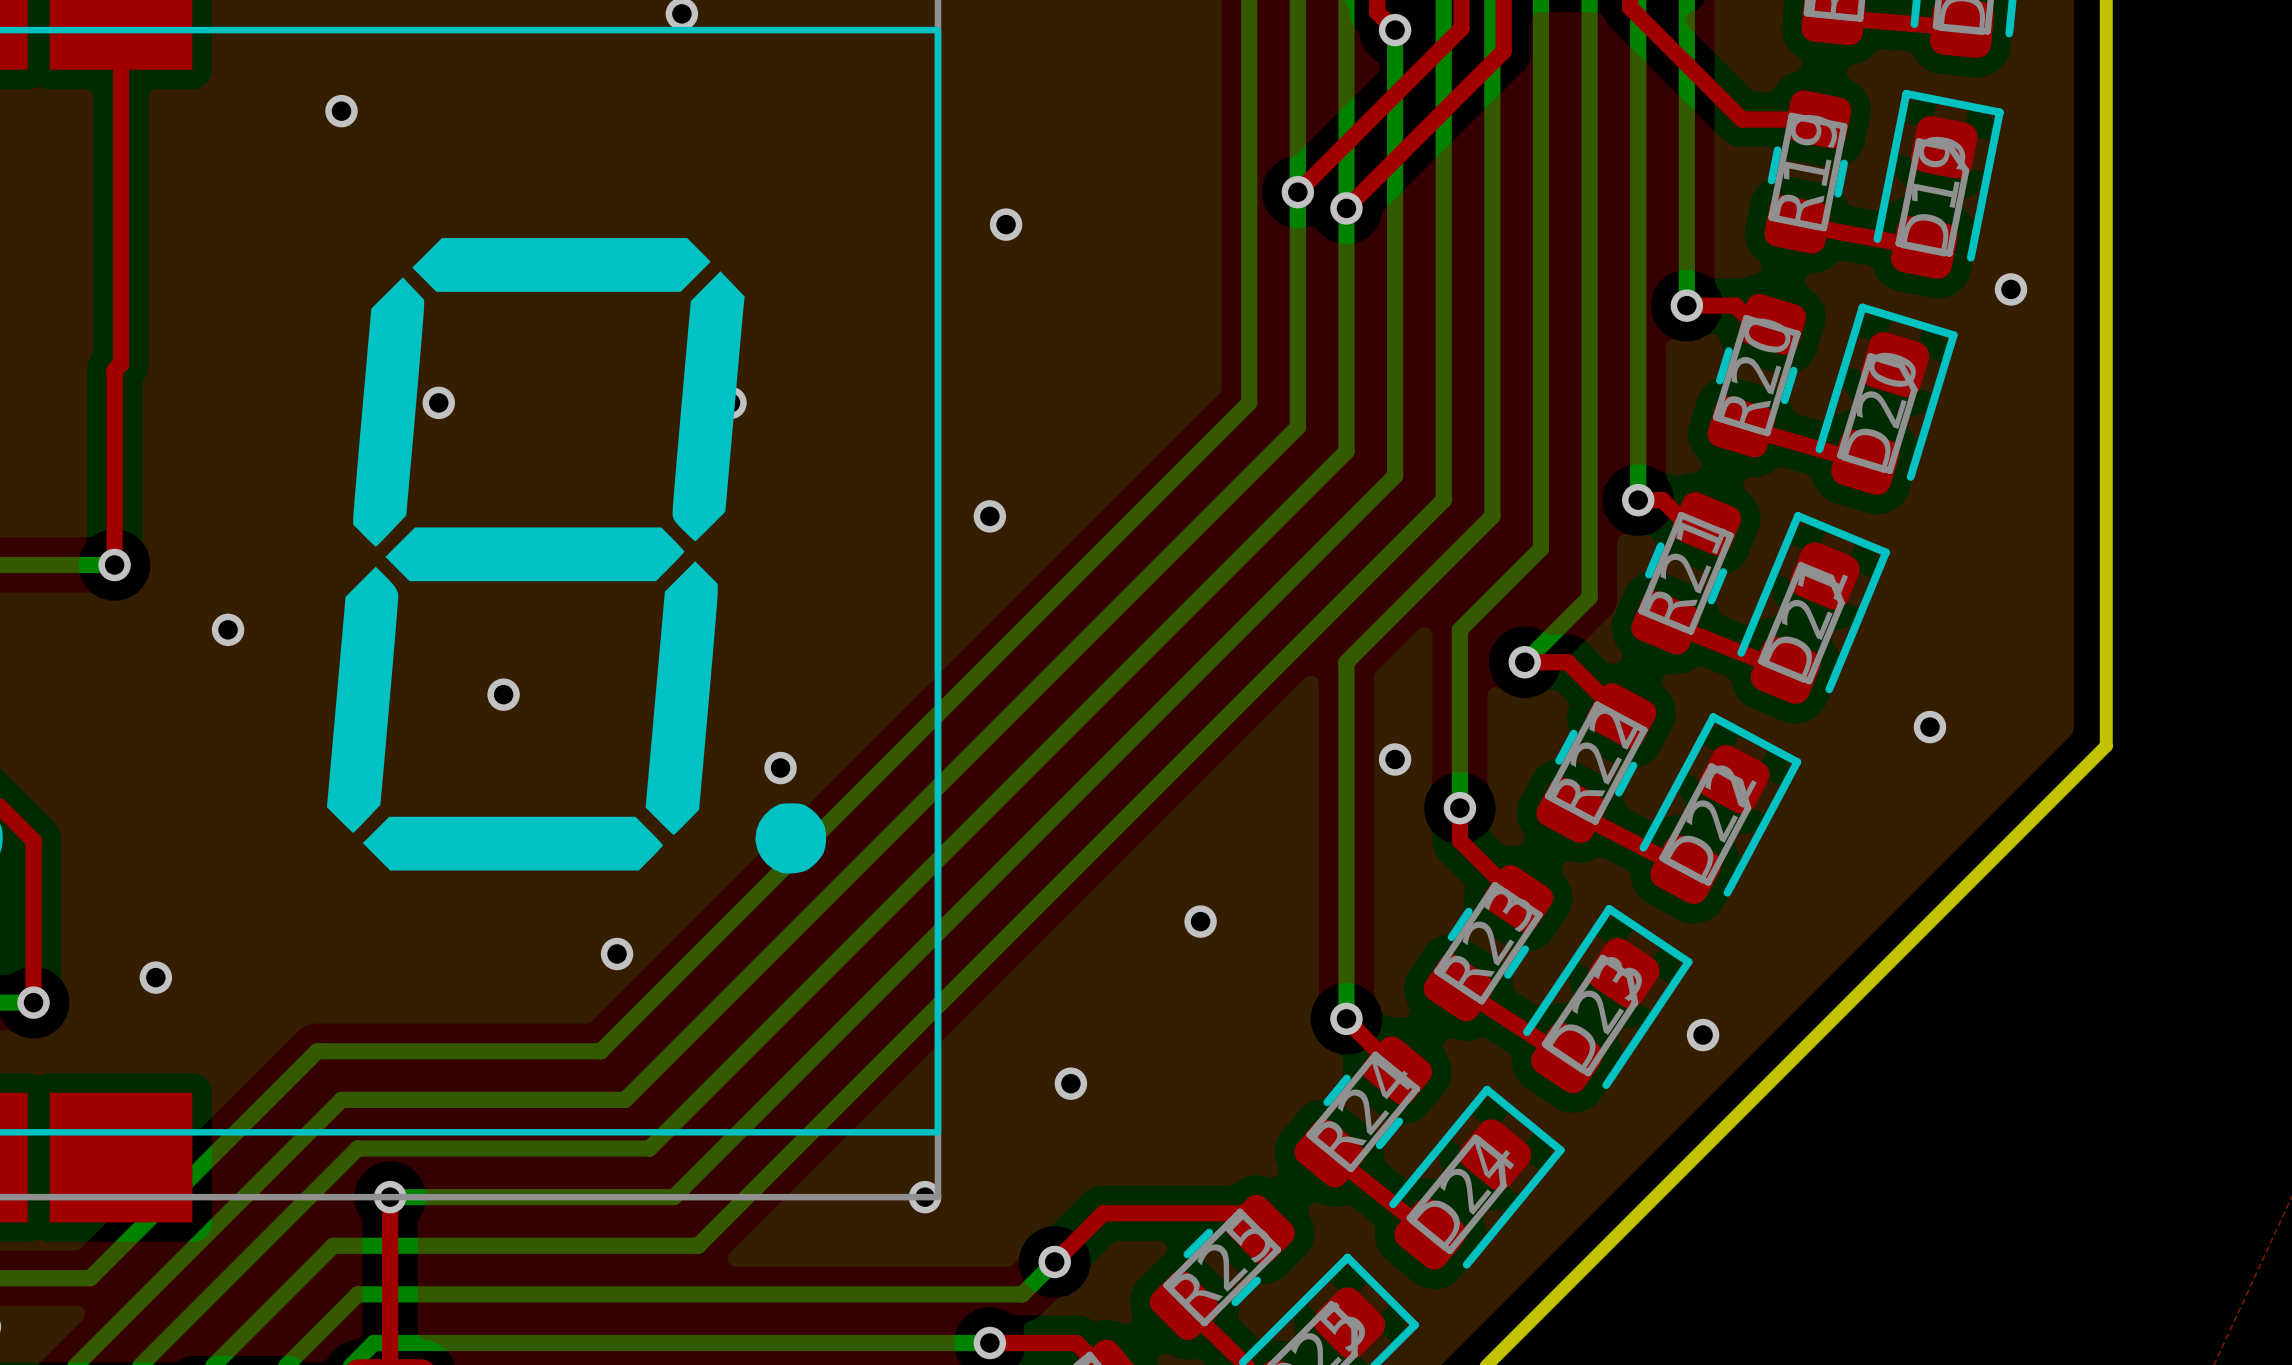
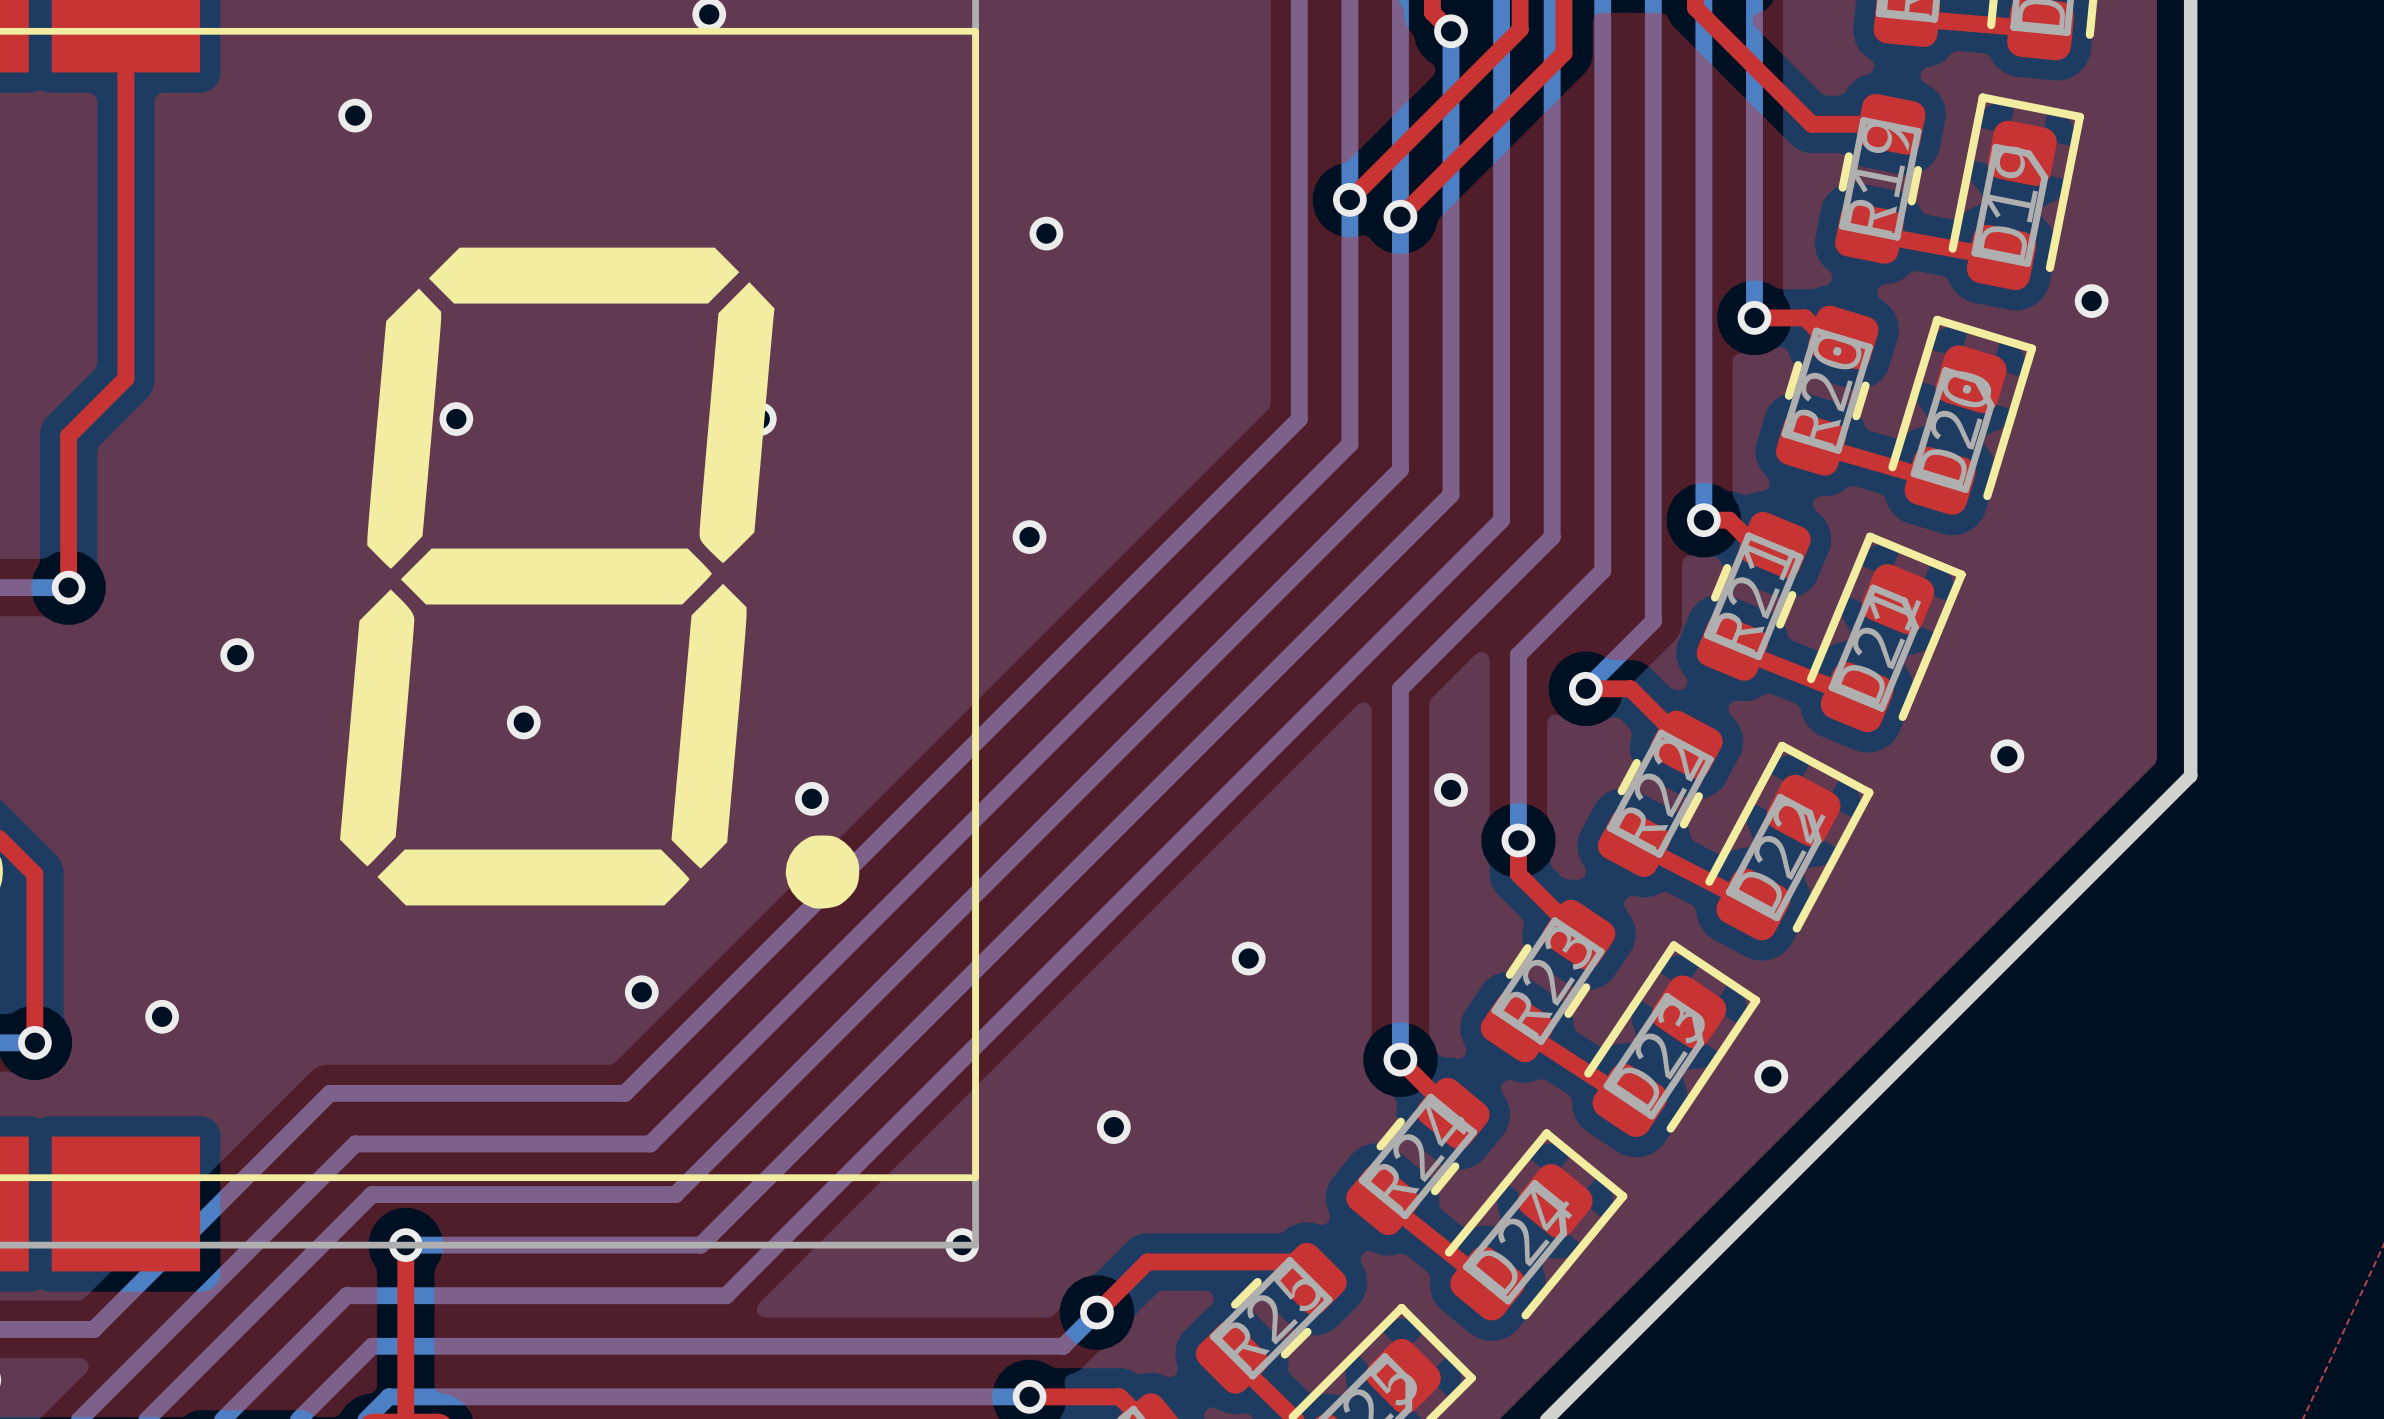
top track: (114, 370) (114, 564) -> (119, 385) (68, 435) (68, 587)
bottom track: (65, 564) (114, 564) -> none
via position: (114, 564) -> (68, 587)

